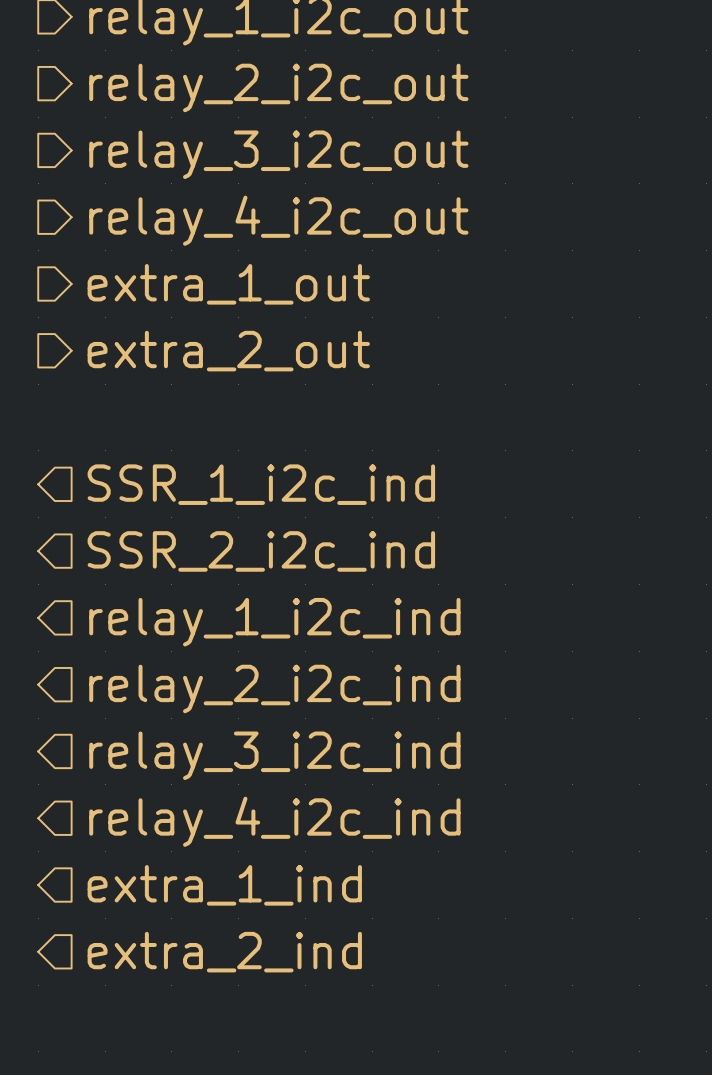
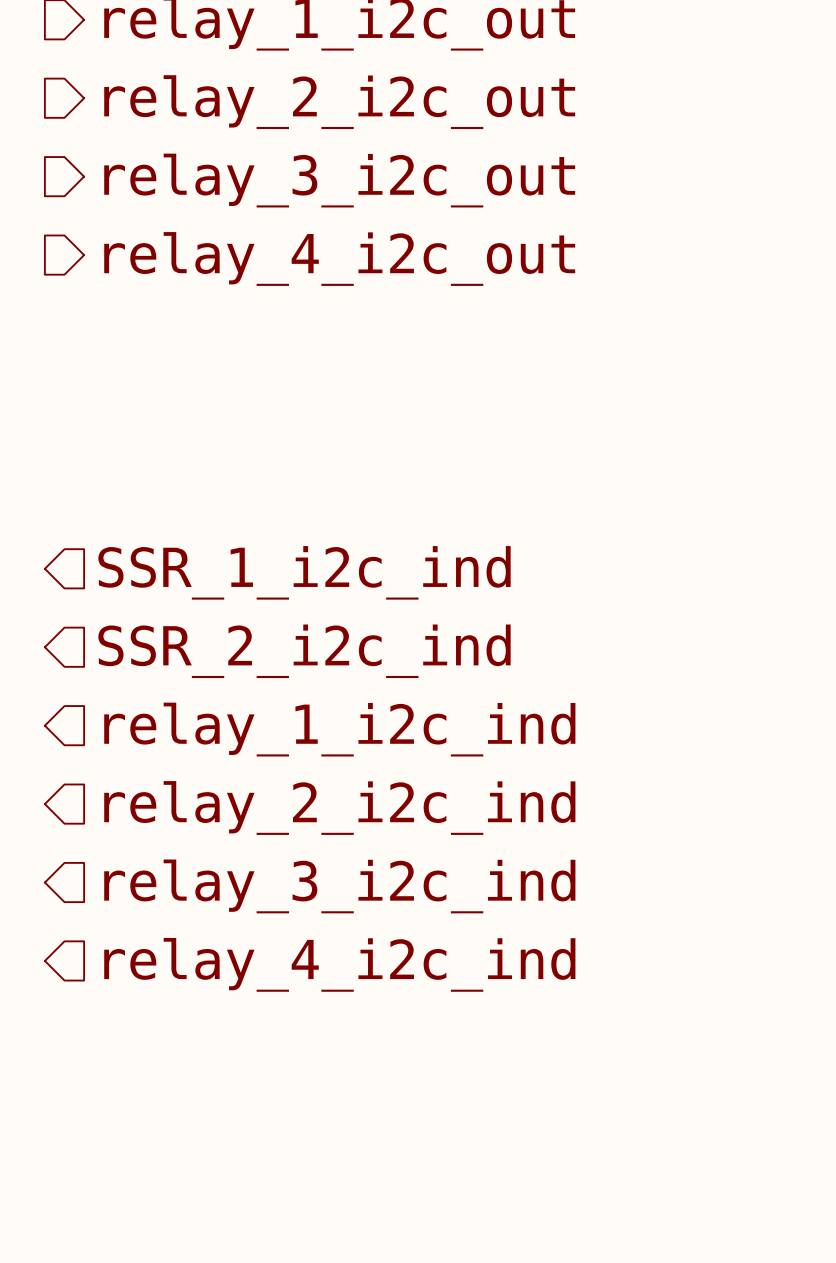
hierarchical label: extra_1_out (228, 284) -> none
hierarchical label: extra_2_out (228, 351) -> none
hierarchical label: extra_1_ind (224, 885) -> none
hierarchical label: extra_2_ind (224, 952) -> none

